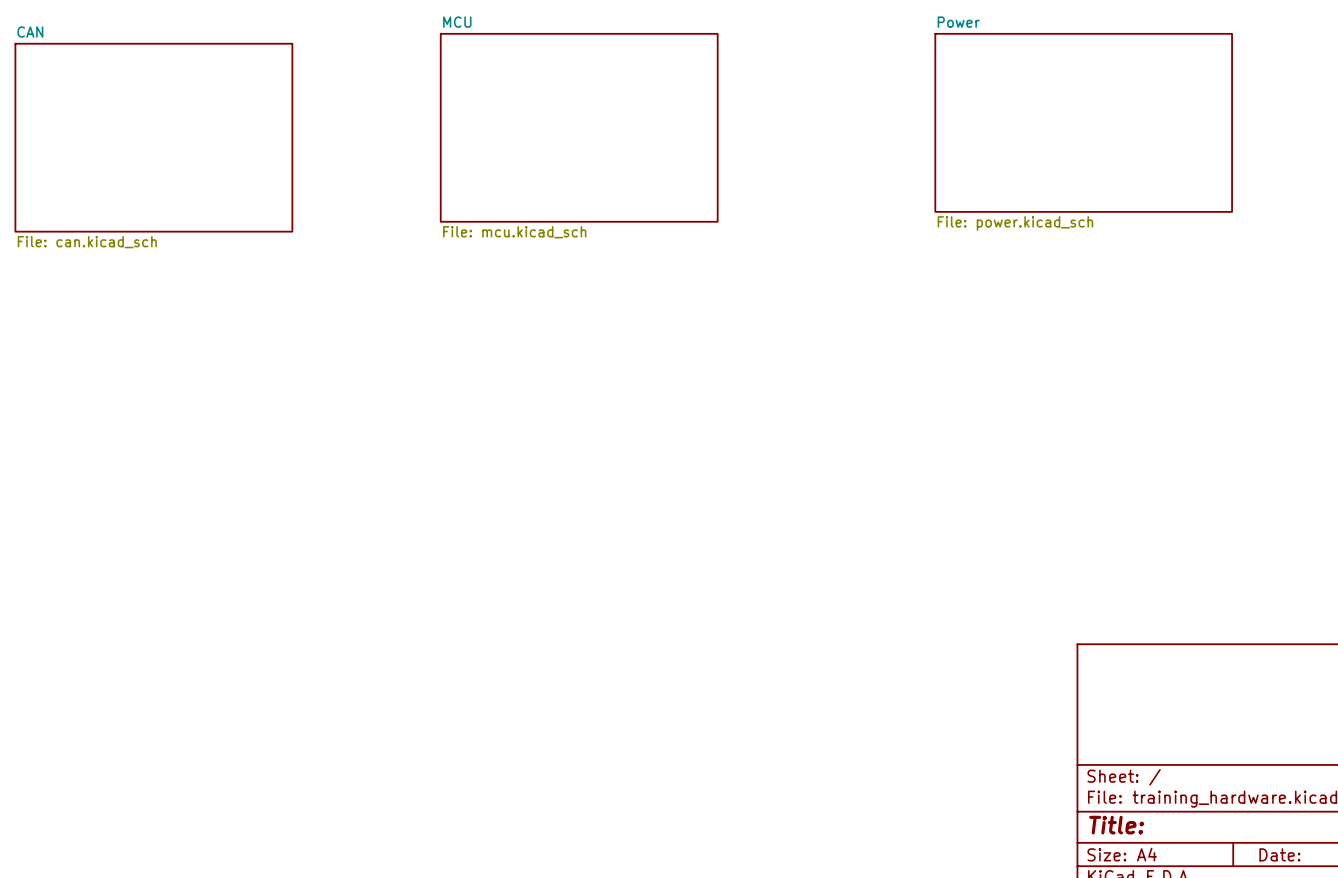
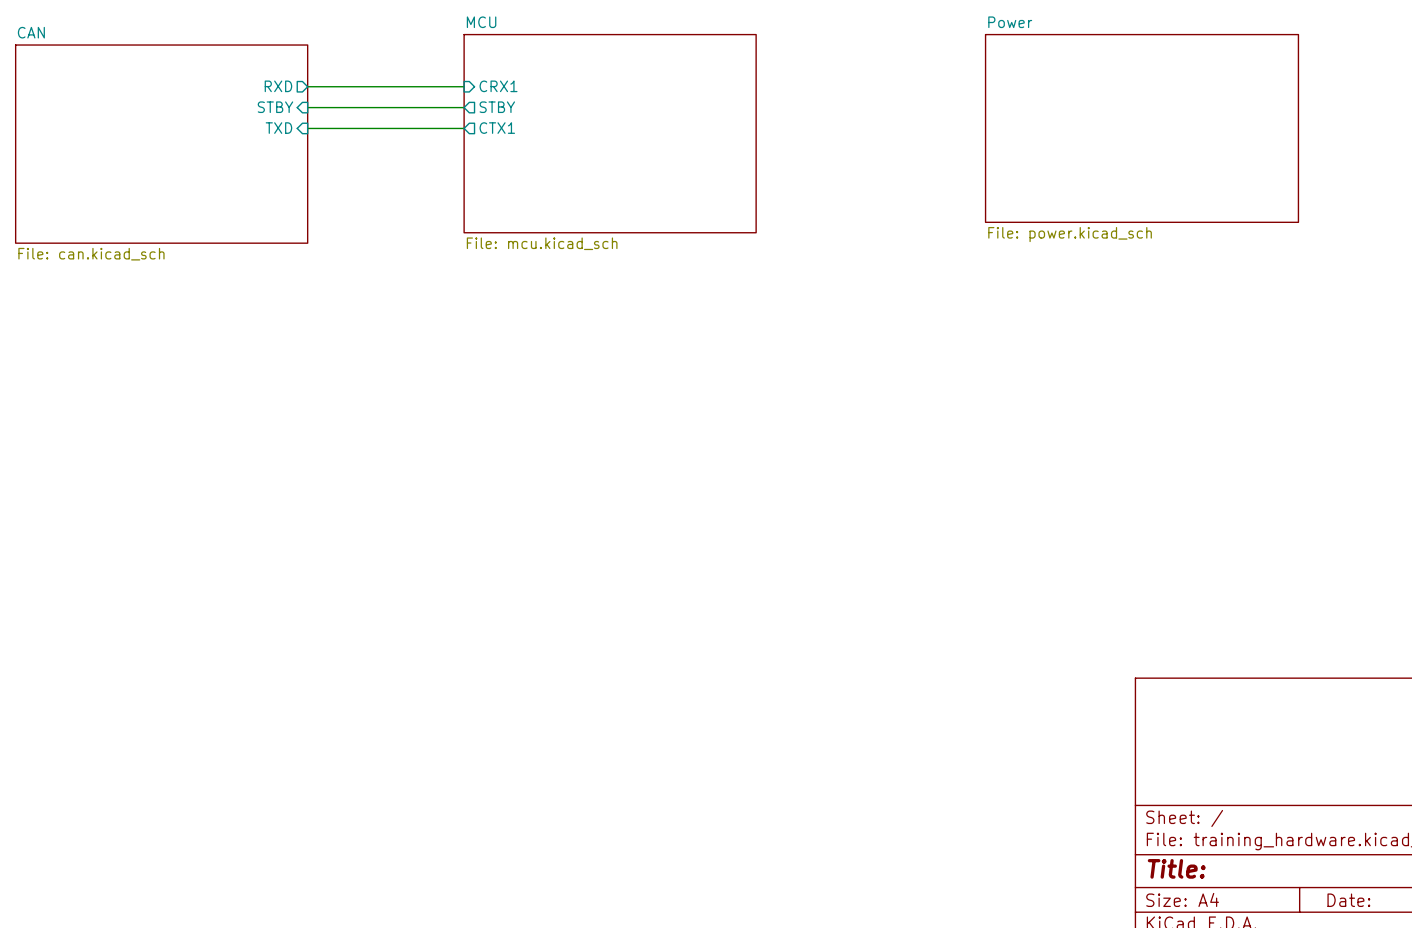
sheet pin: none -> RXD (278, 86)
sheet pin: none -> CRX1 (498, 86)
wire: none -> (307, 86) (464, 86)
sheet pin: none -> STBY (275, 107)
sheet pin: none -> STBY (497, 107)
wire: none -> (307, 107) (464, 107)
sheet pin: none -> TXD (278, 128)
wire: none -> (307, 128) (464, 128)
sheet pin: none -> CTX1 (497, 128)

